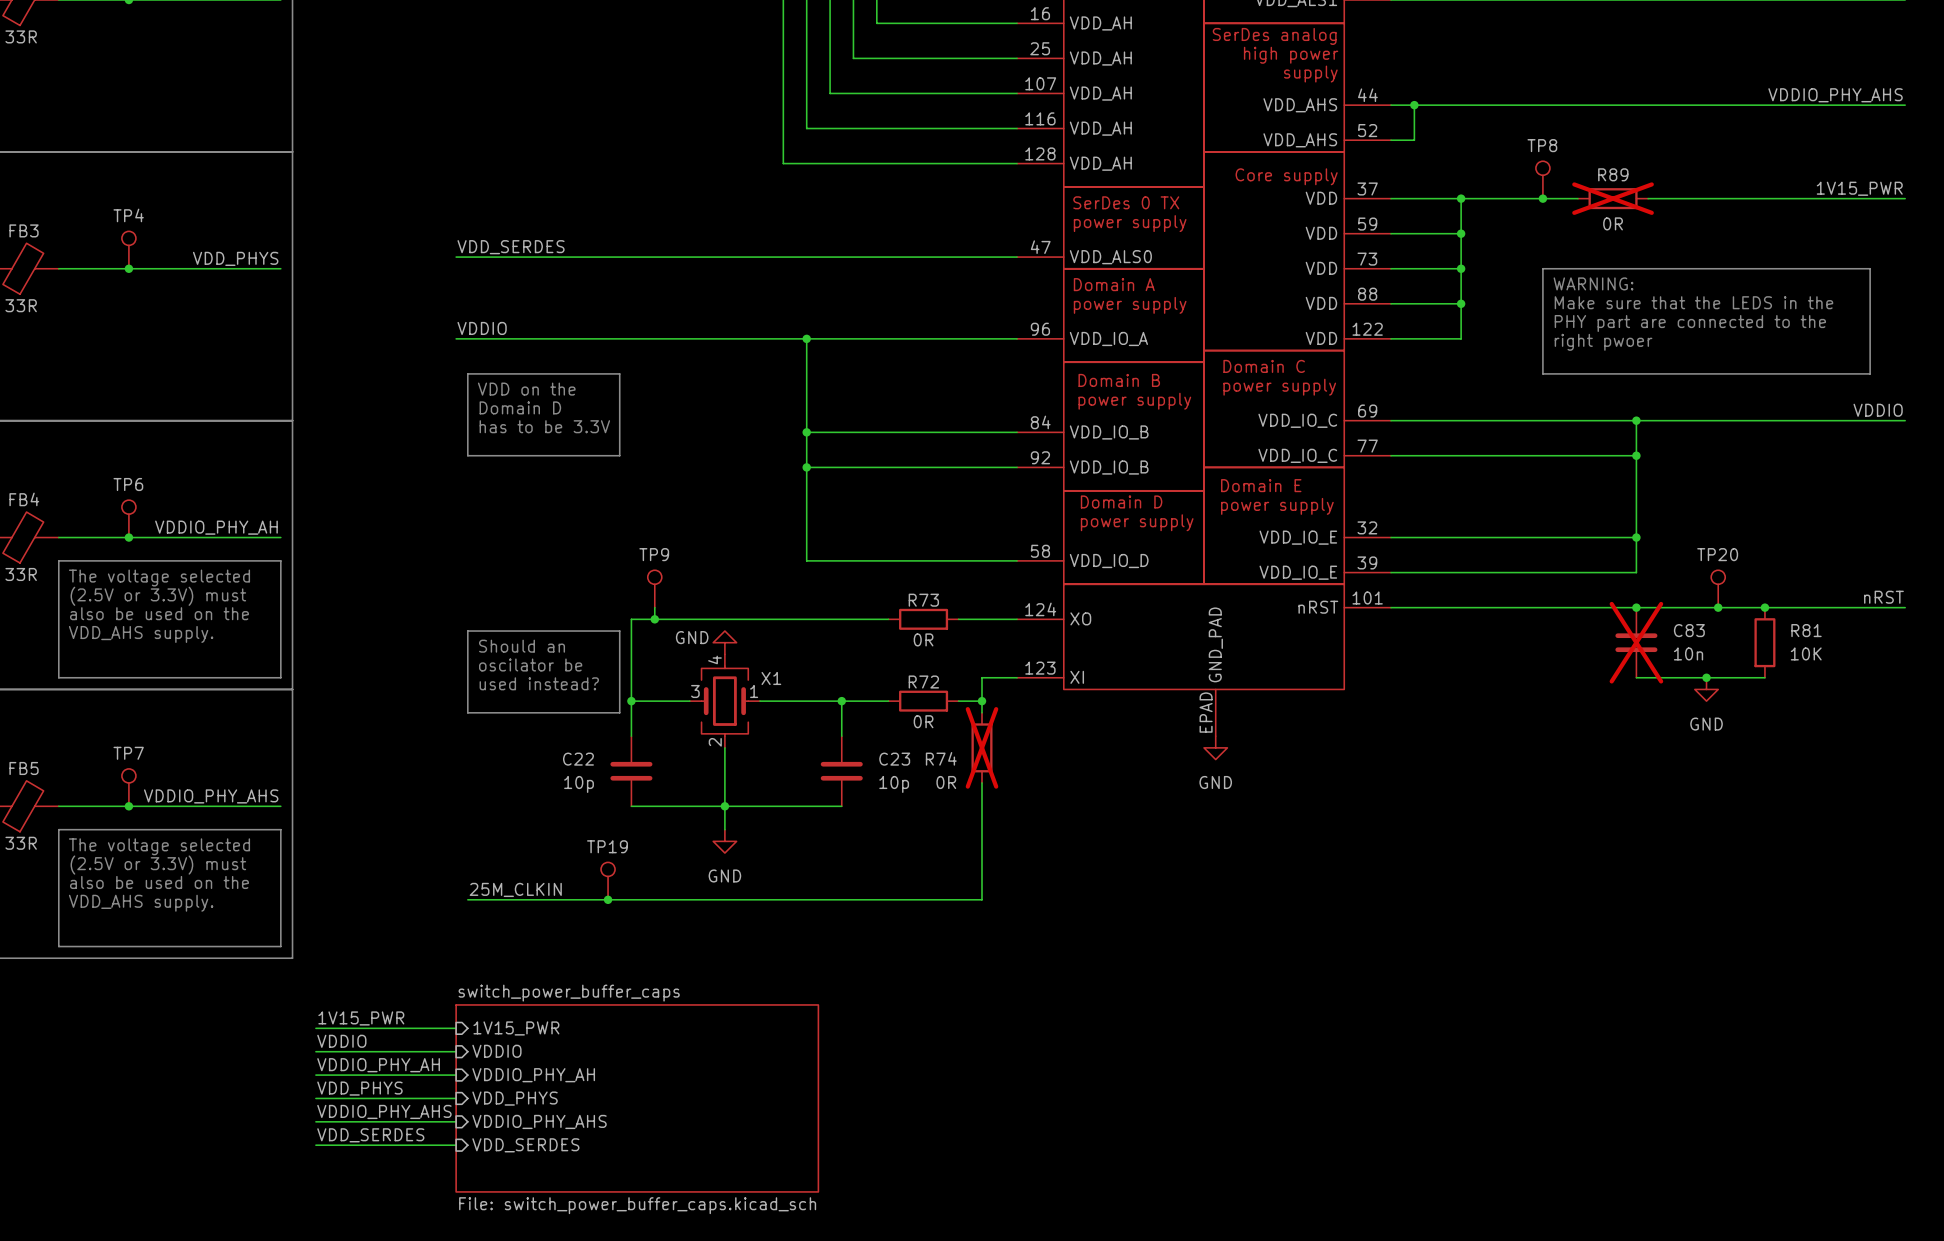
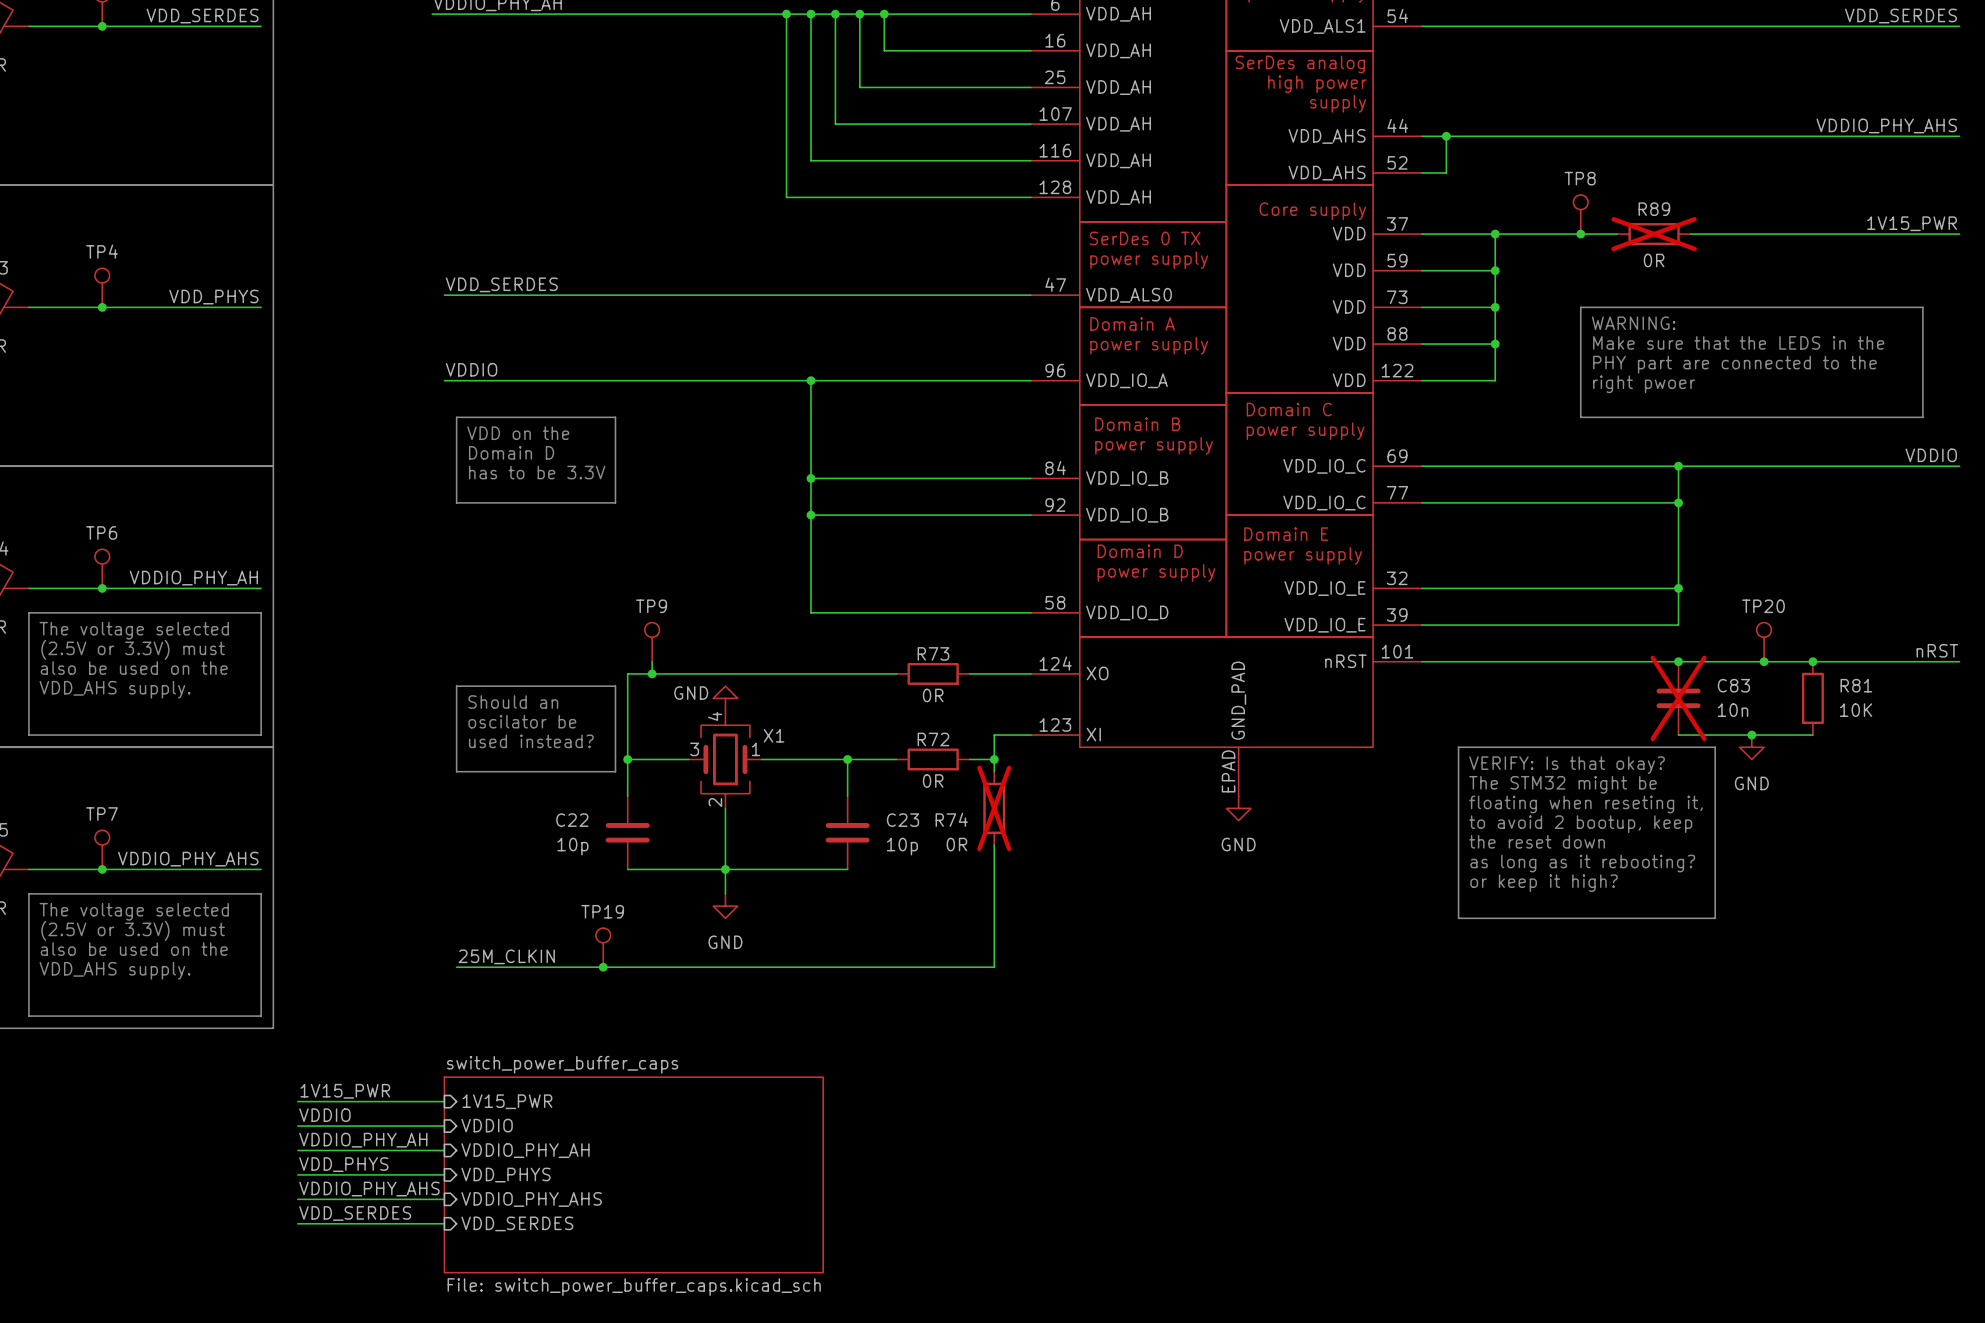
line: none -> (1458, 747) (1715, 747) (1715, 918) (1458, 918) (1458, 747)
text: none -> VERIFY: Is that okay? (1567, 765)
text: none -> The STM32 might be (1562, 784)
text: none -> floating when reseting it, (1585, 804)
text: none -> to avoid 2 bootup, keep (1580, 824)
text: none -> the reset down (1537, 841)
text: none -> as long as it rebooting? (1582, 863)
text: none -> or keep it high? (1544, 883)

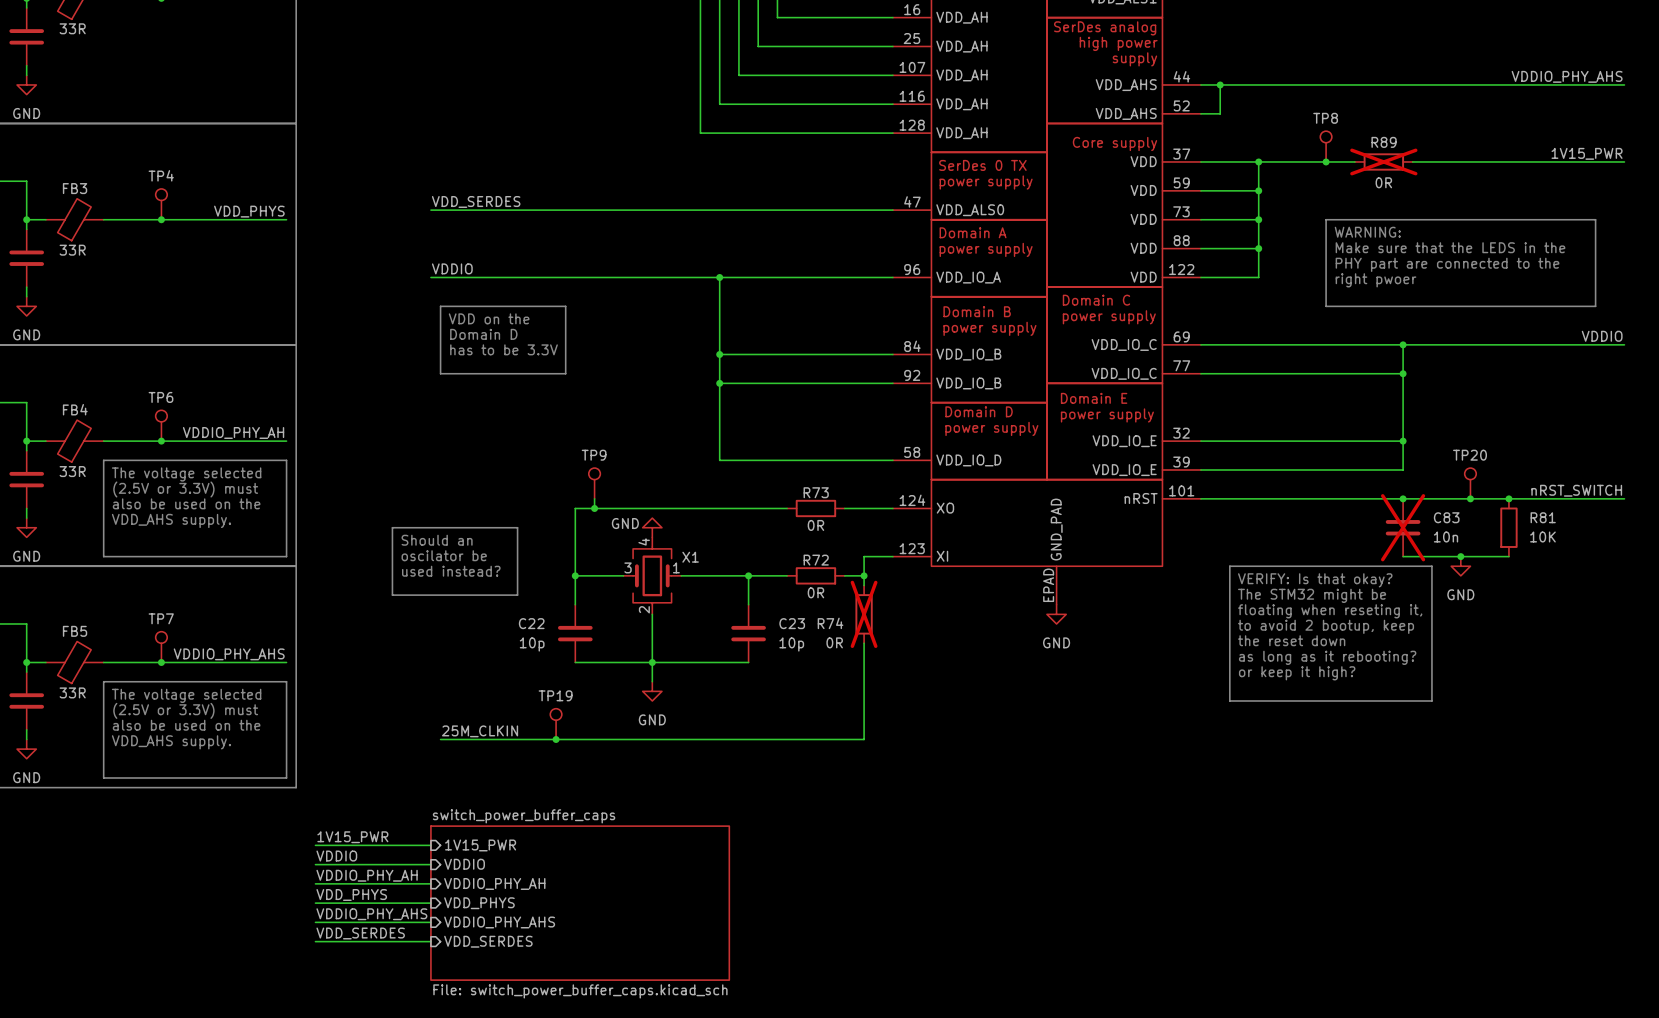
label: nRST (1937, 650) -> nRST_SWITCH (1576, 490)
line: (456, 686) (615, 686) (615, 771) (456, 771) (456, 686) -> (392, 527) (517, 527) (517, 595) (392, 595) (392, 527)
text position: Should an (513, 702) -> Should an (437, 540)
text position: oscilator be (522, 721) -> oscilator be (444, 555)
text position: used instead? (531, 741) -> used instead? (451, 571)

